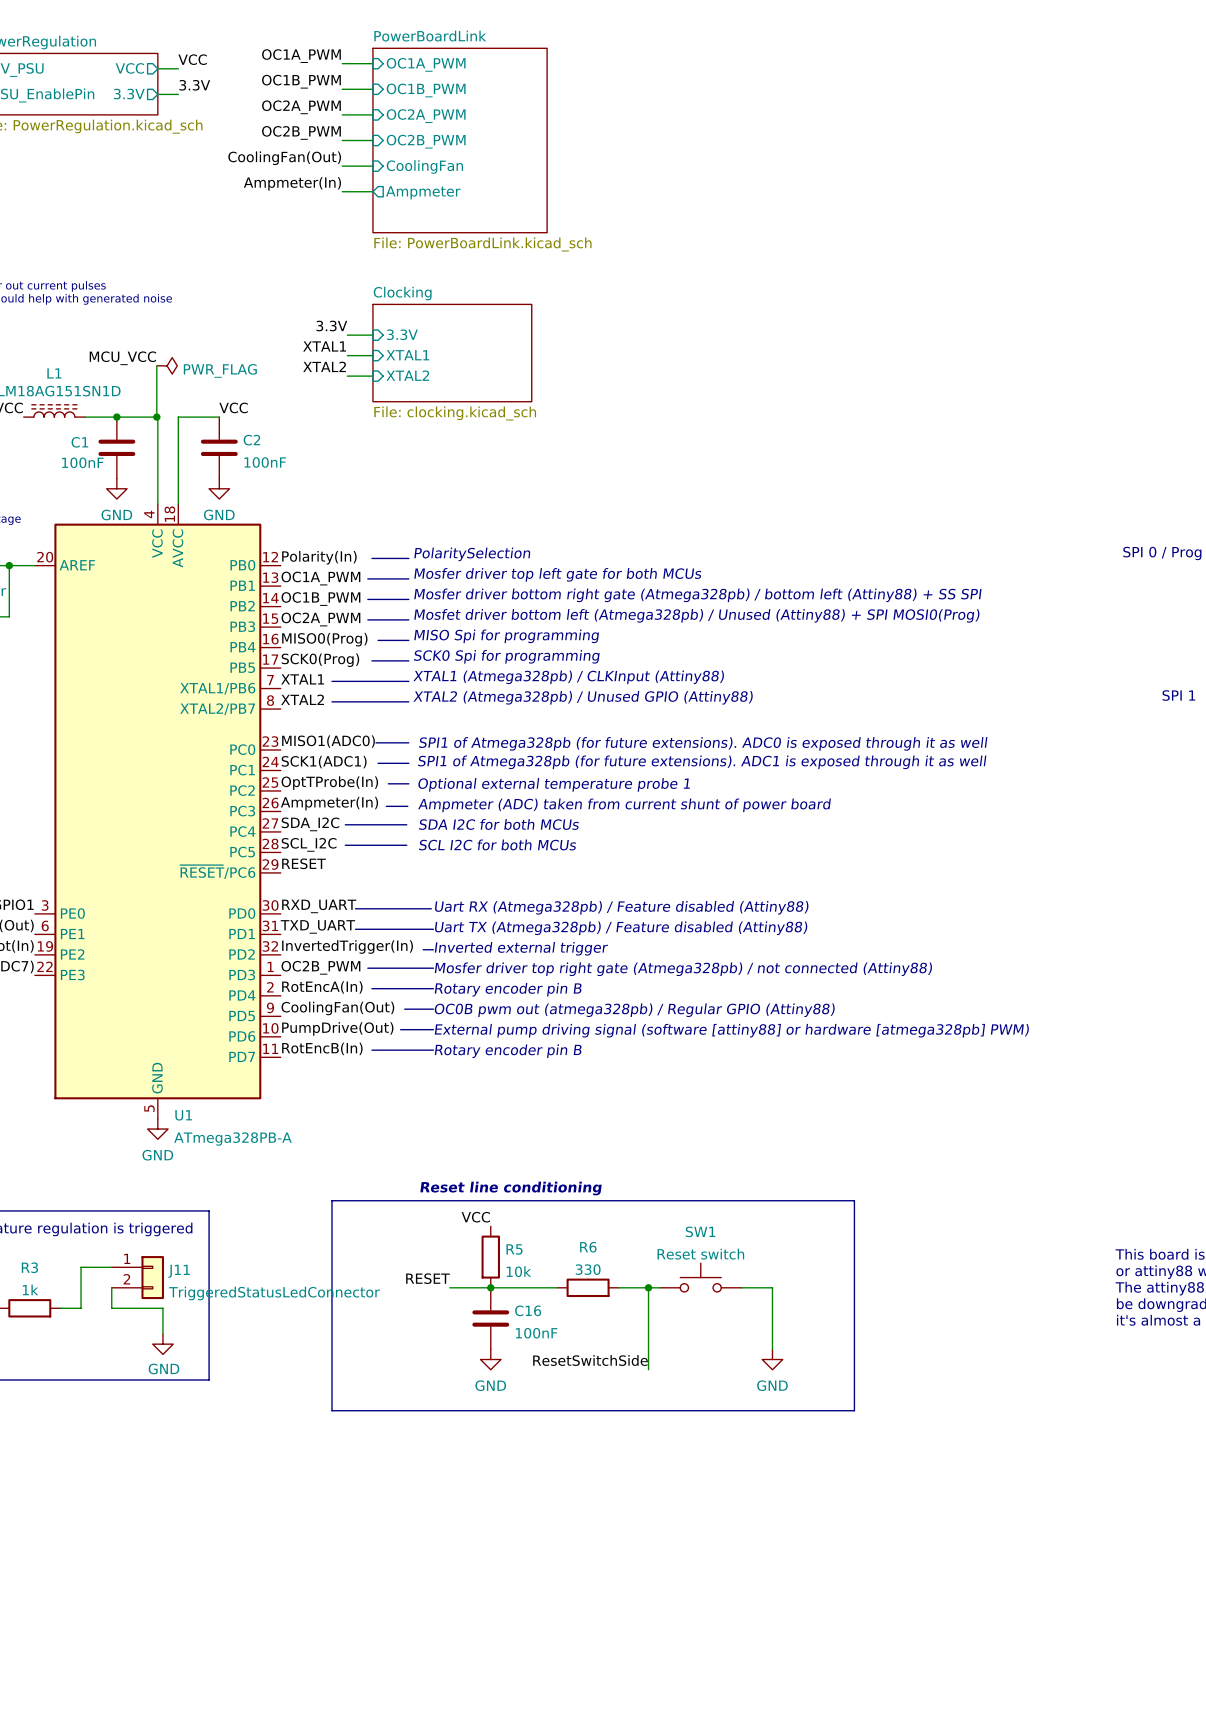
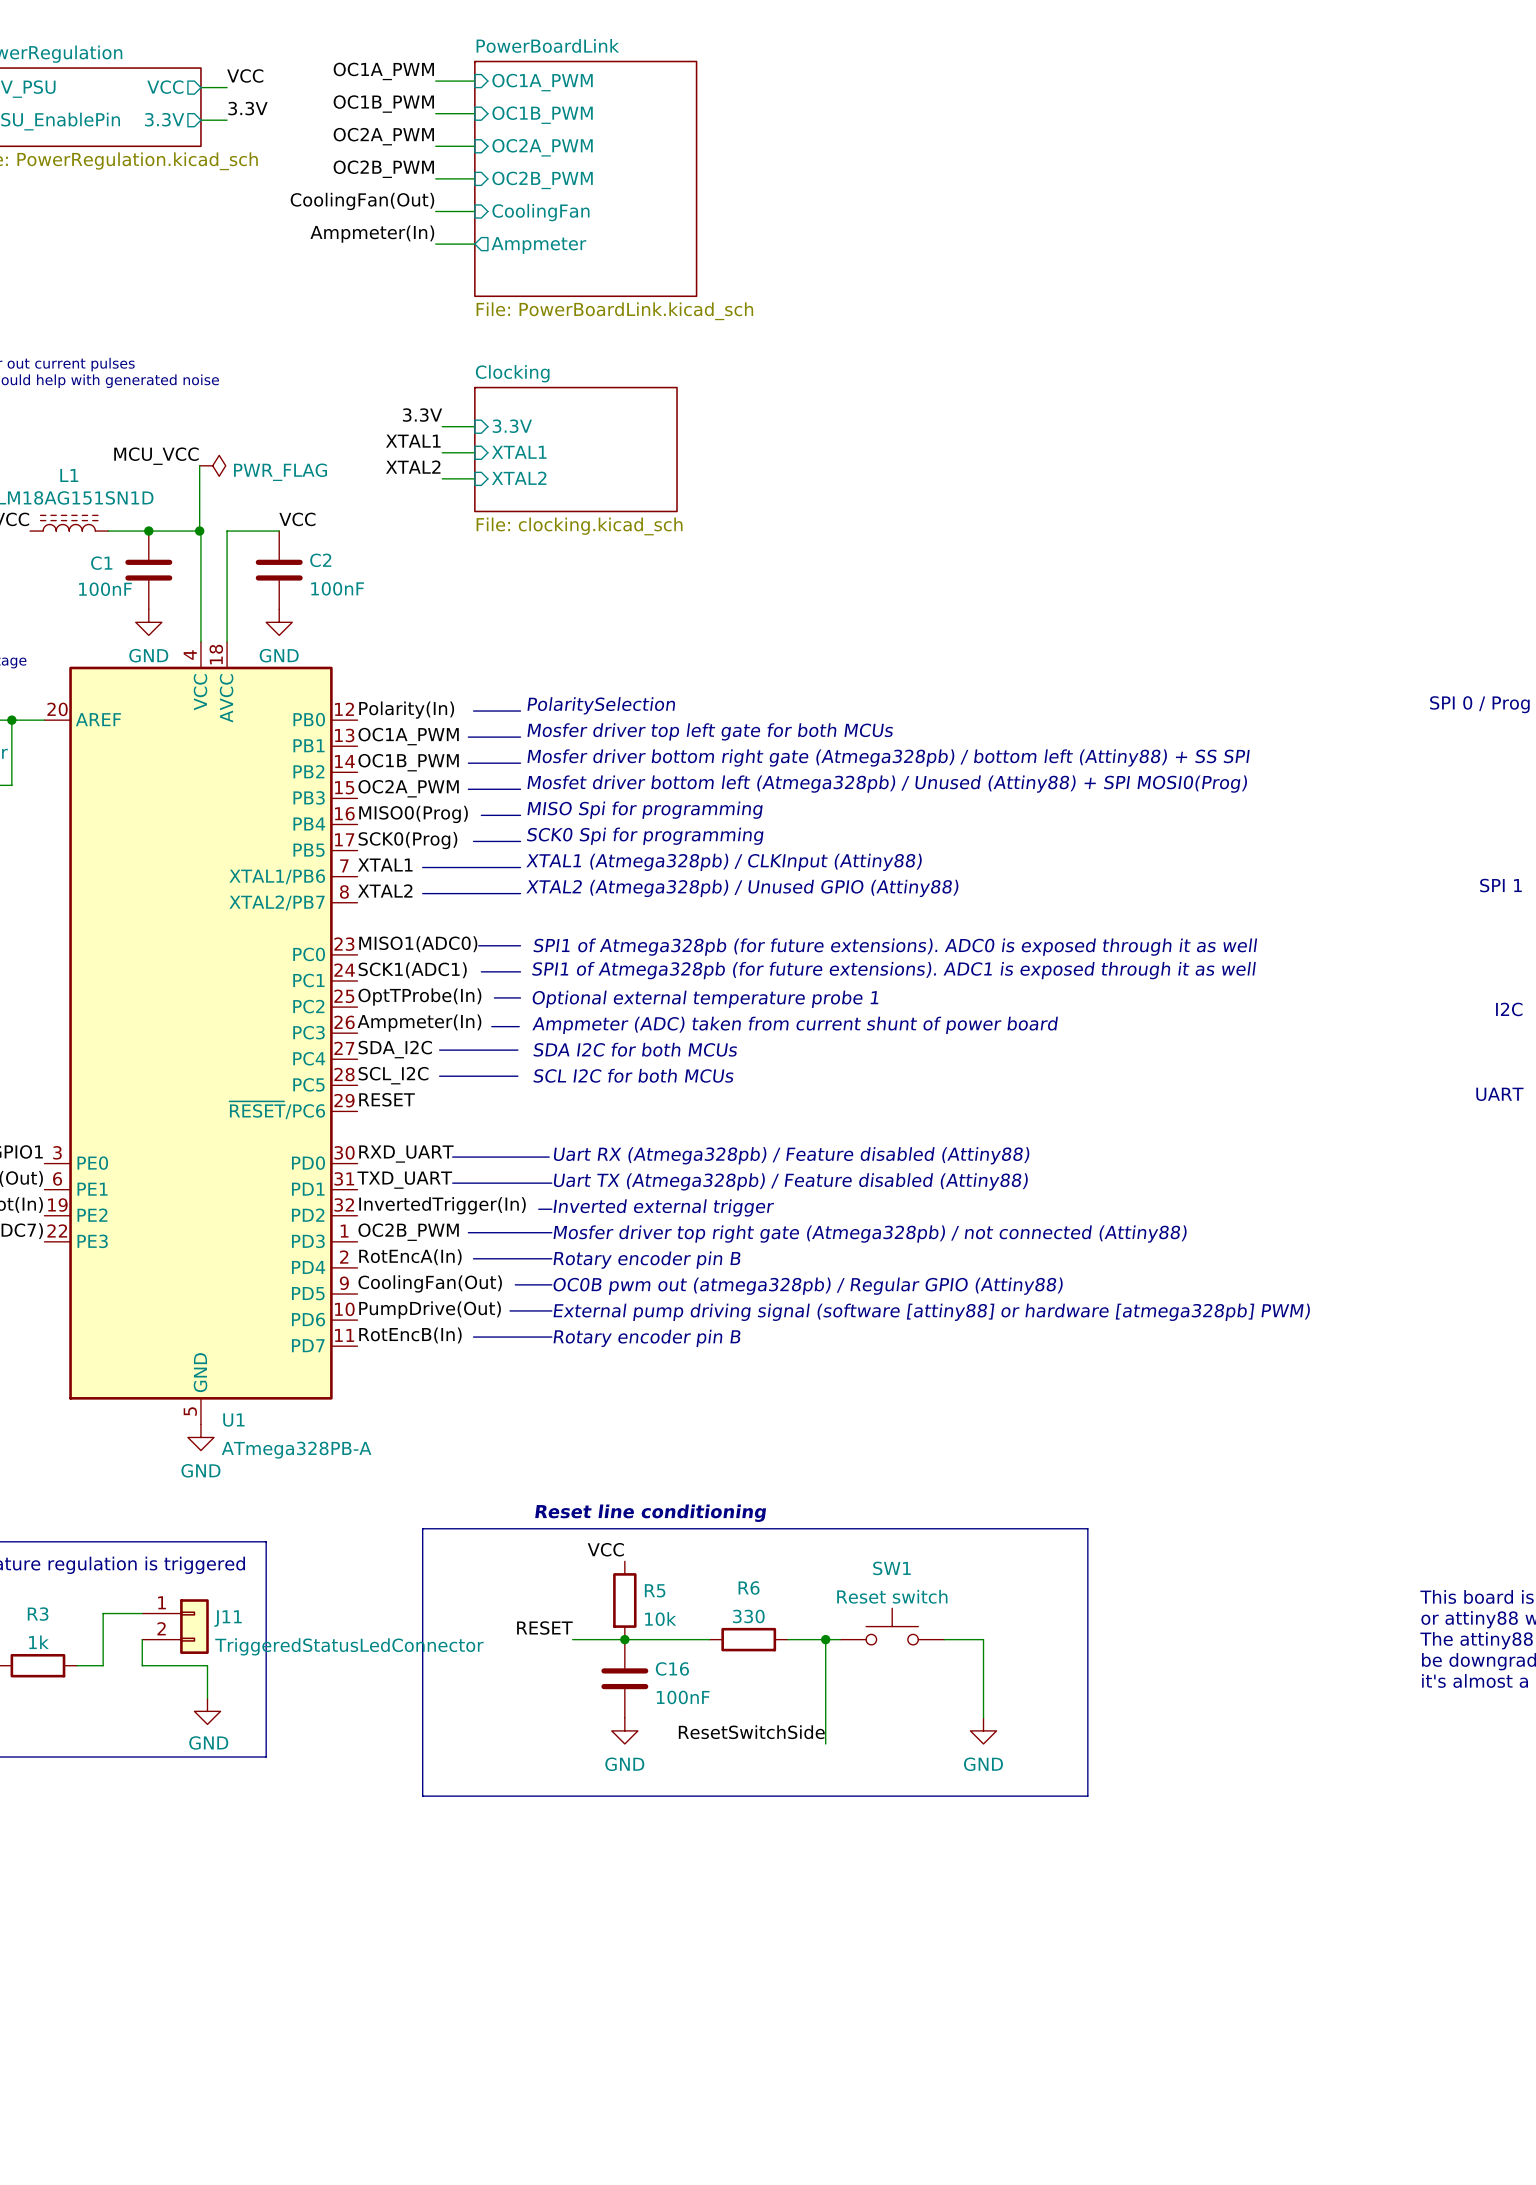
text: none -> I2C (1509, 1009)
text: none -> UART (1499, 1094)

